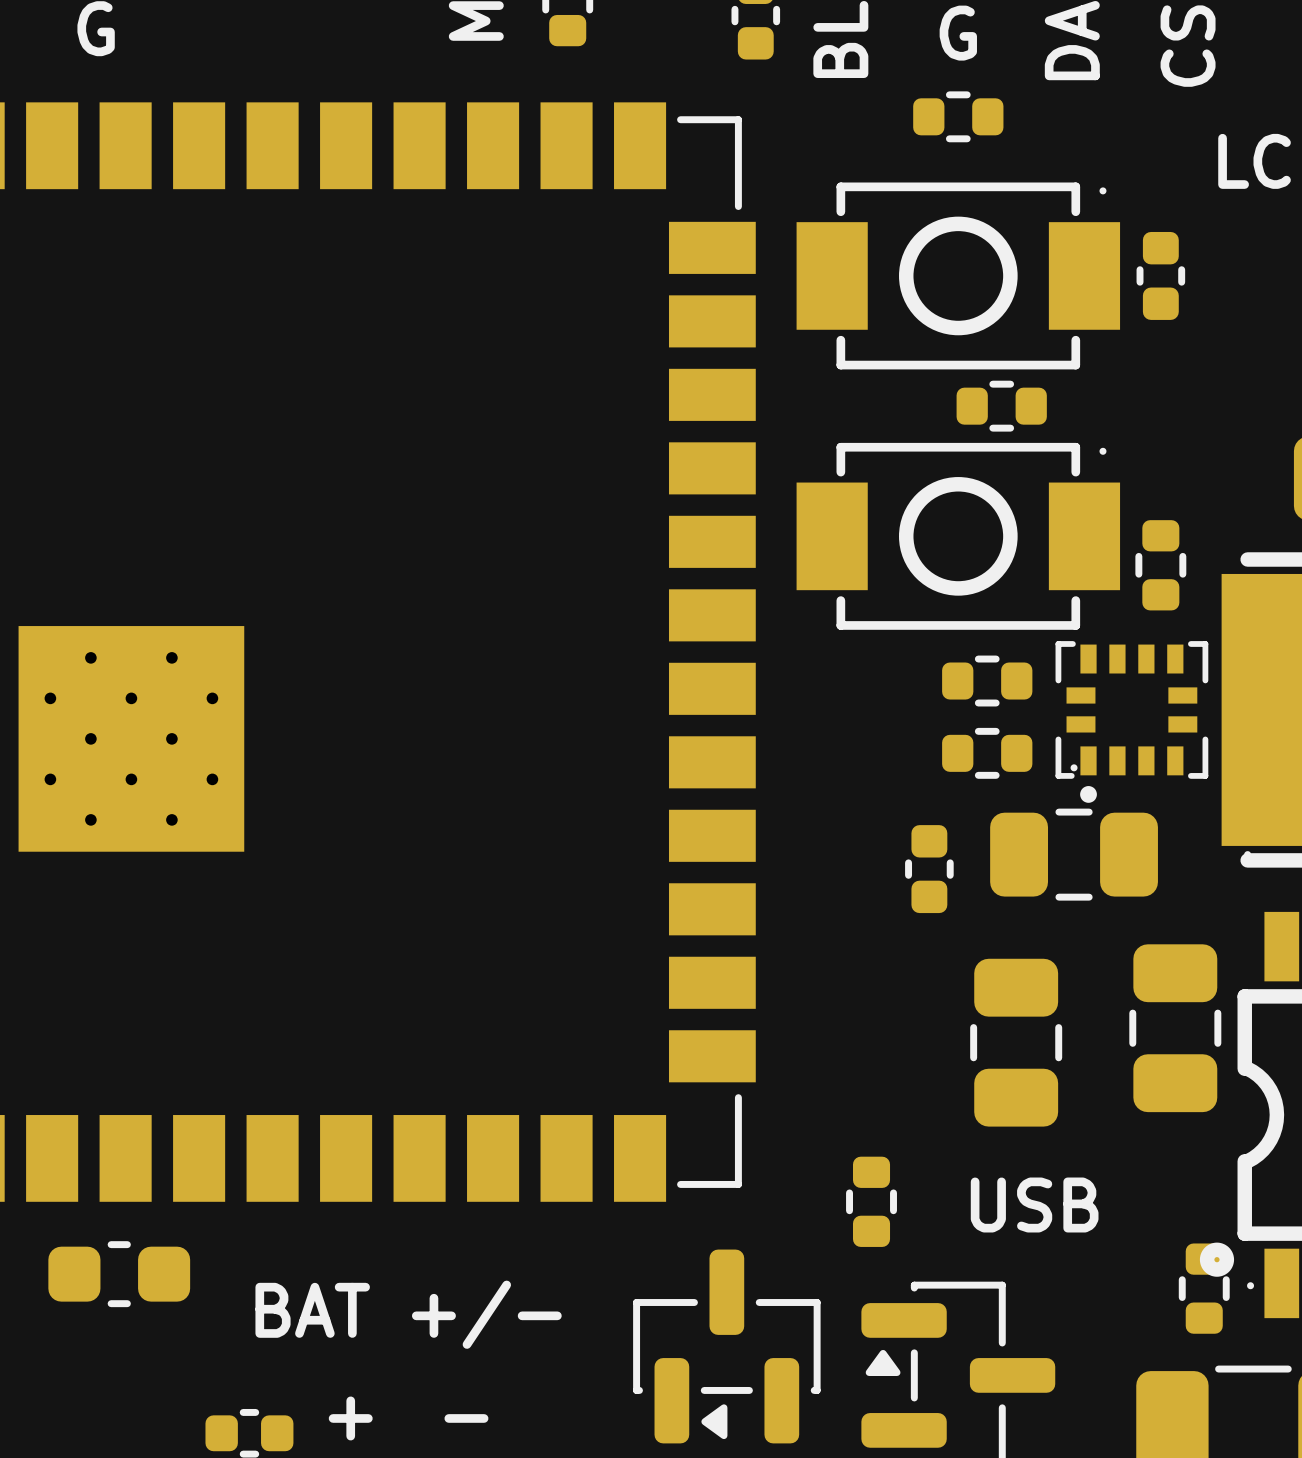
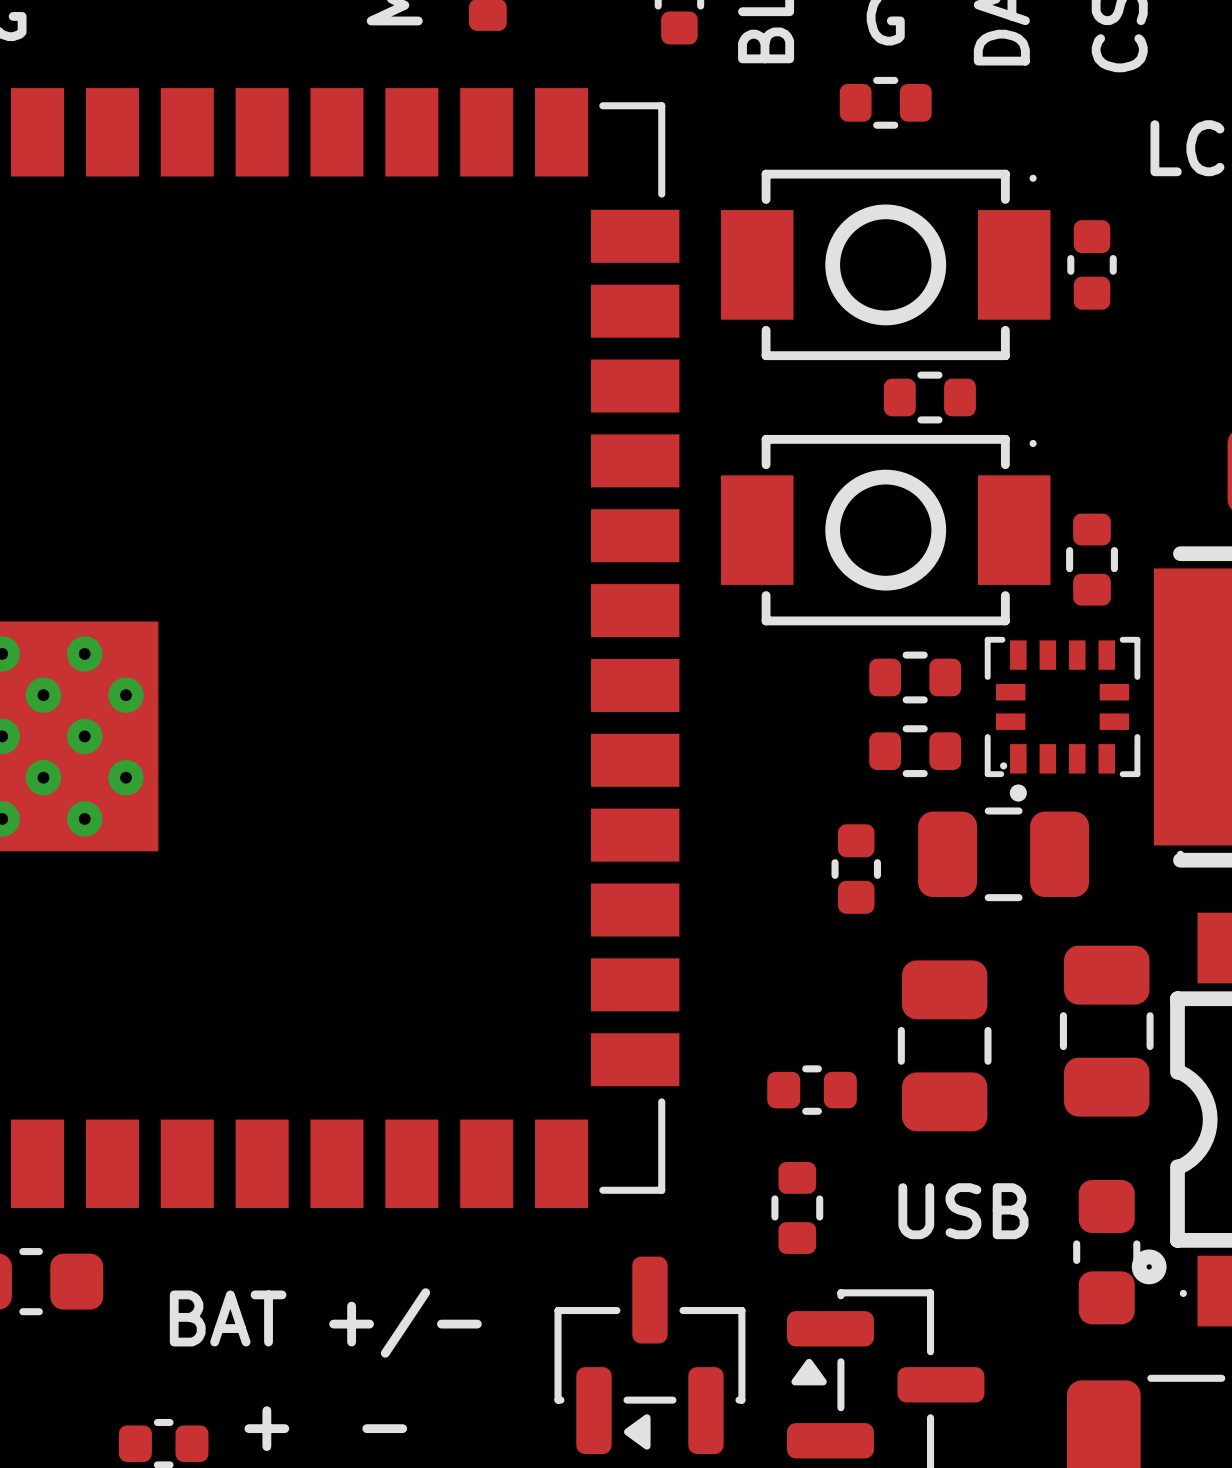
part: none -> (812, 1090)
part footprint: [1178, 1243, 1230, 1334] -> [1073, 1179, 1141, 1325]

